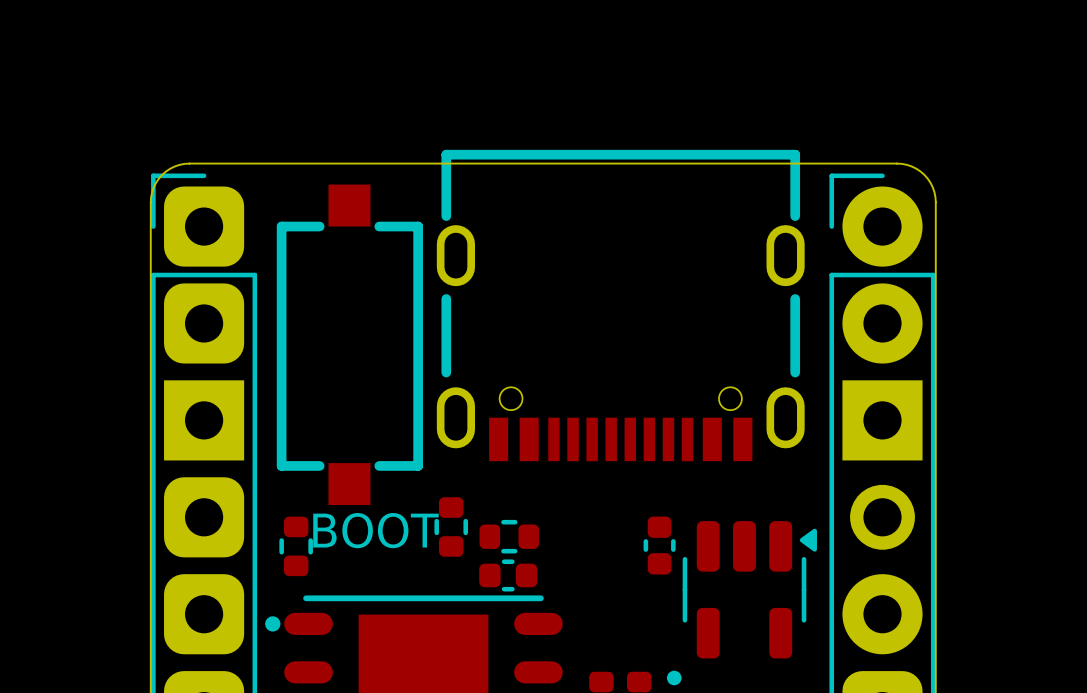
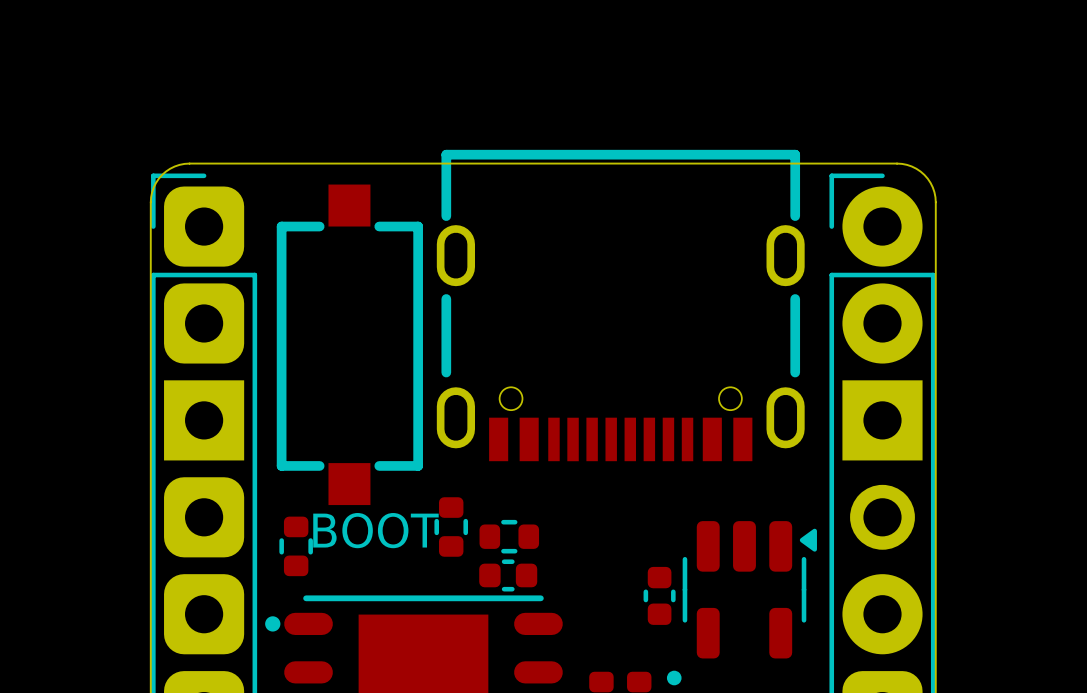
part position: (659, 545) -> (659, 595)

